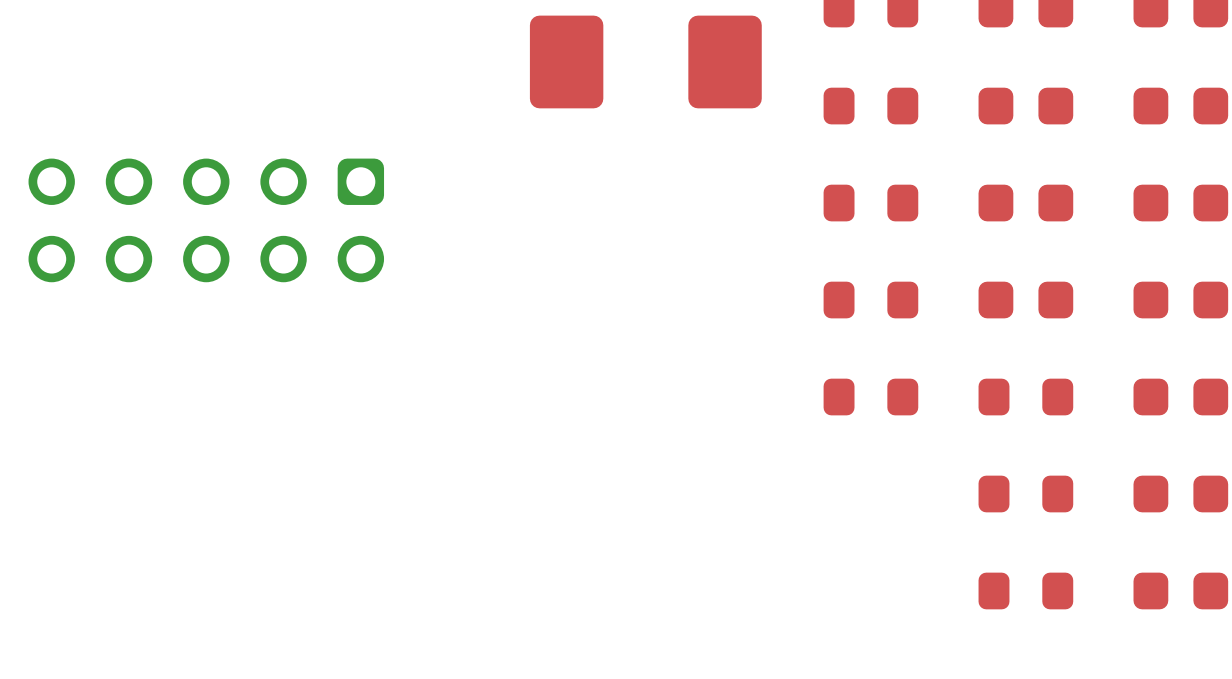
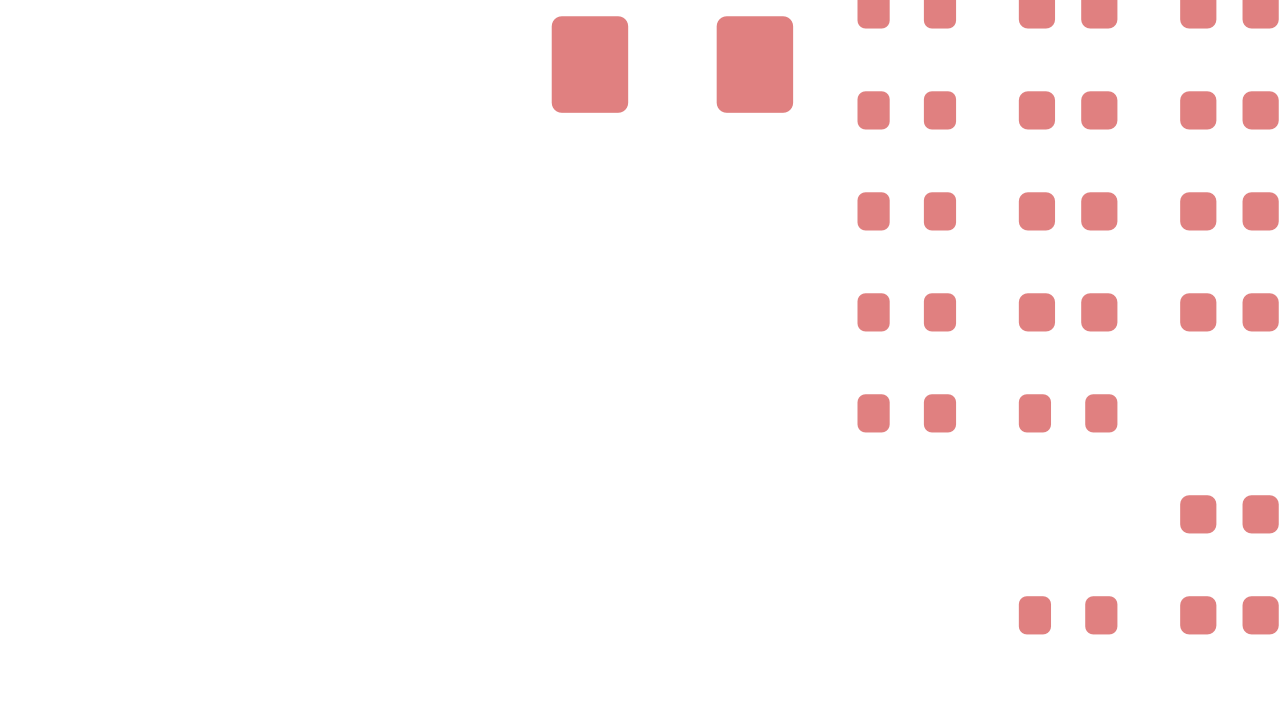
part: (206, 220) -> none
part: (1180, 397) -> none
part: (1025, 494) -> none

